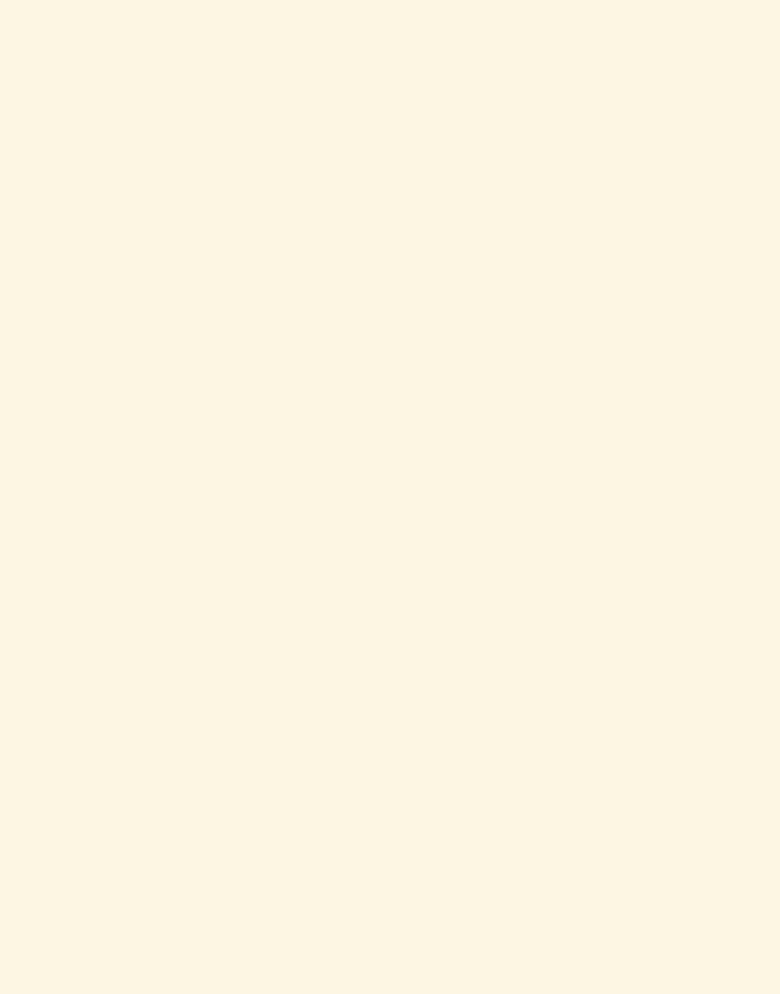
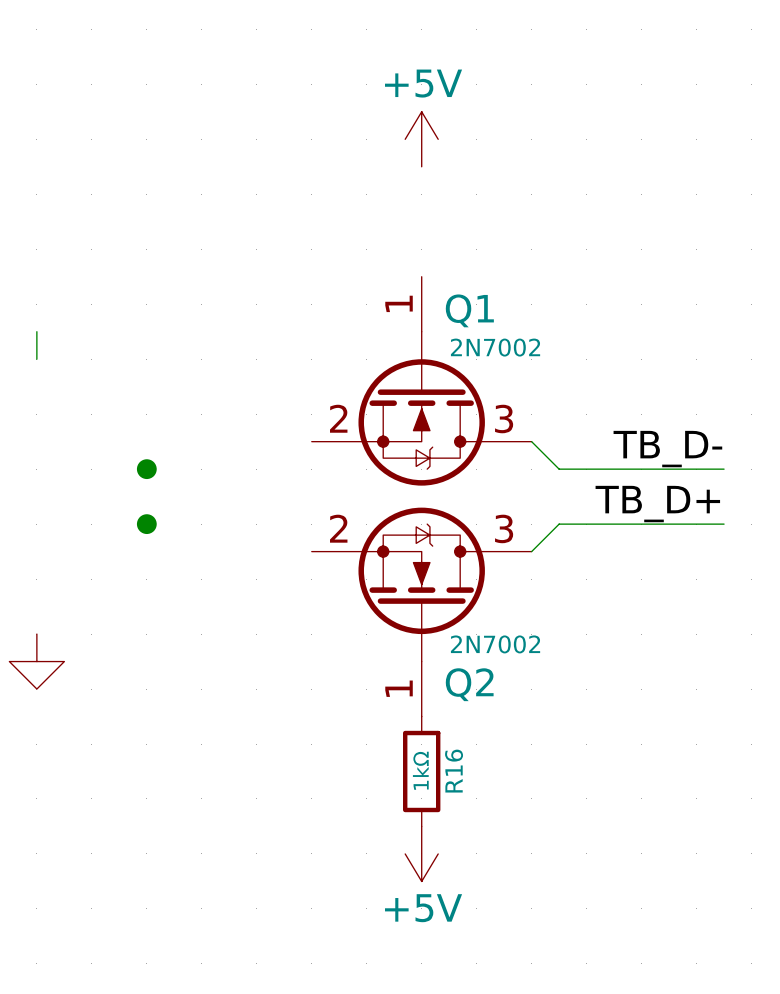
power symbol: none -> +5V (421, 139)
wire: none -> (36, 331) (36, 359)
Q1: none -> 2N7002 (421, 381)
wire: none -> (531, 441) (559, 469) (724, 469)
label: none -> TB_D- (667, 449)
junction: none -> (146, 469)
label: none -> TB_D+ (657, 504)
junction: none -> (146, 524)
wire: none -> (724, 524) (559, 524) (531, 551)
Q2: none -> 2N7002 (421, 612)
power symbol: none -> (36, 661)
R16: none -> 1kΩ (421, 771)
power symbol: none -> +5V (421, 853)

